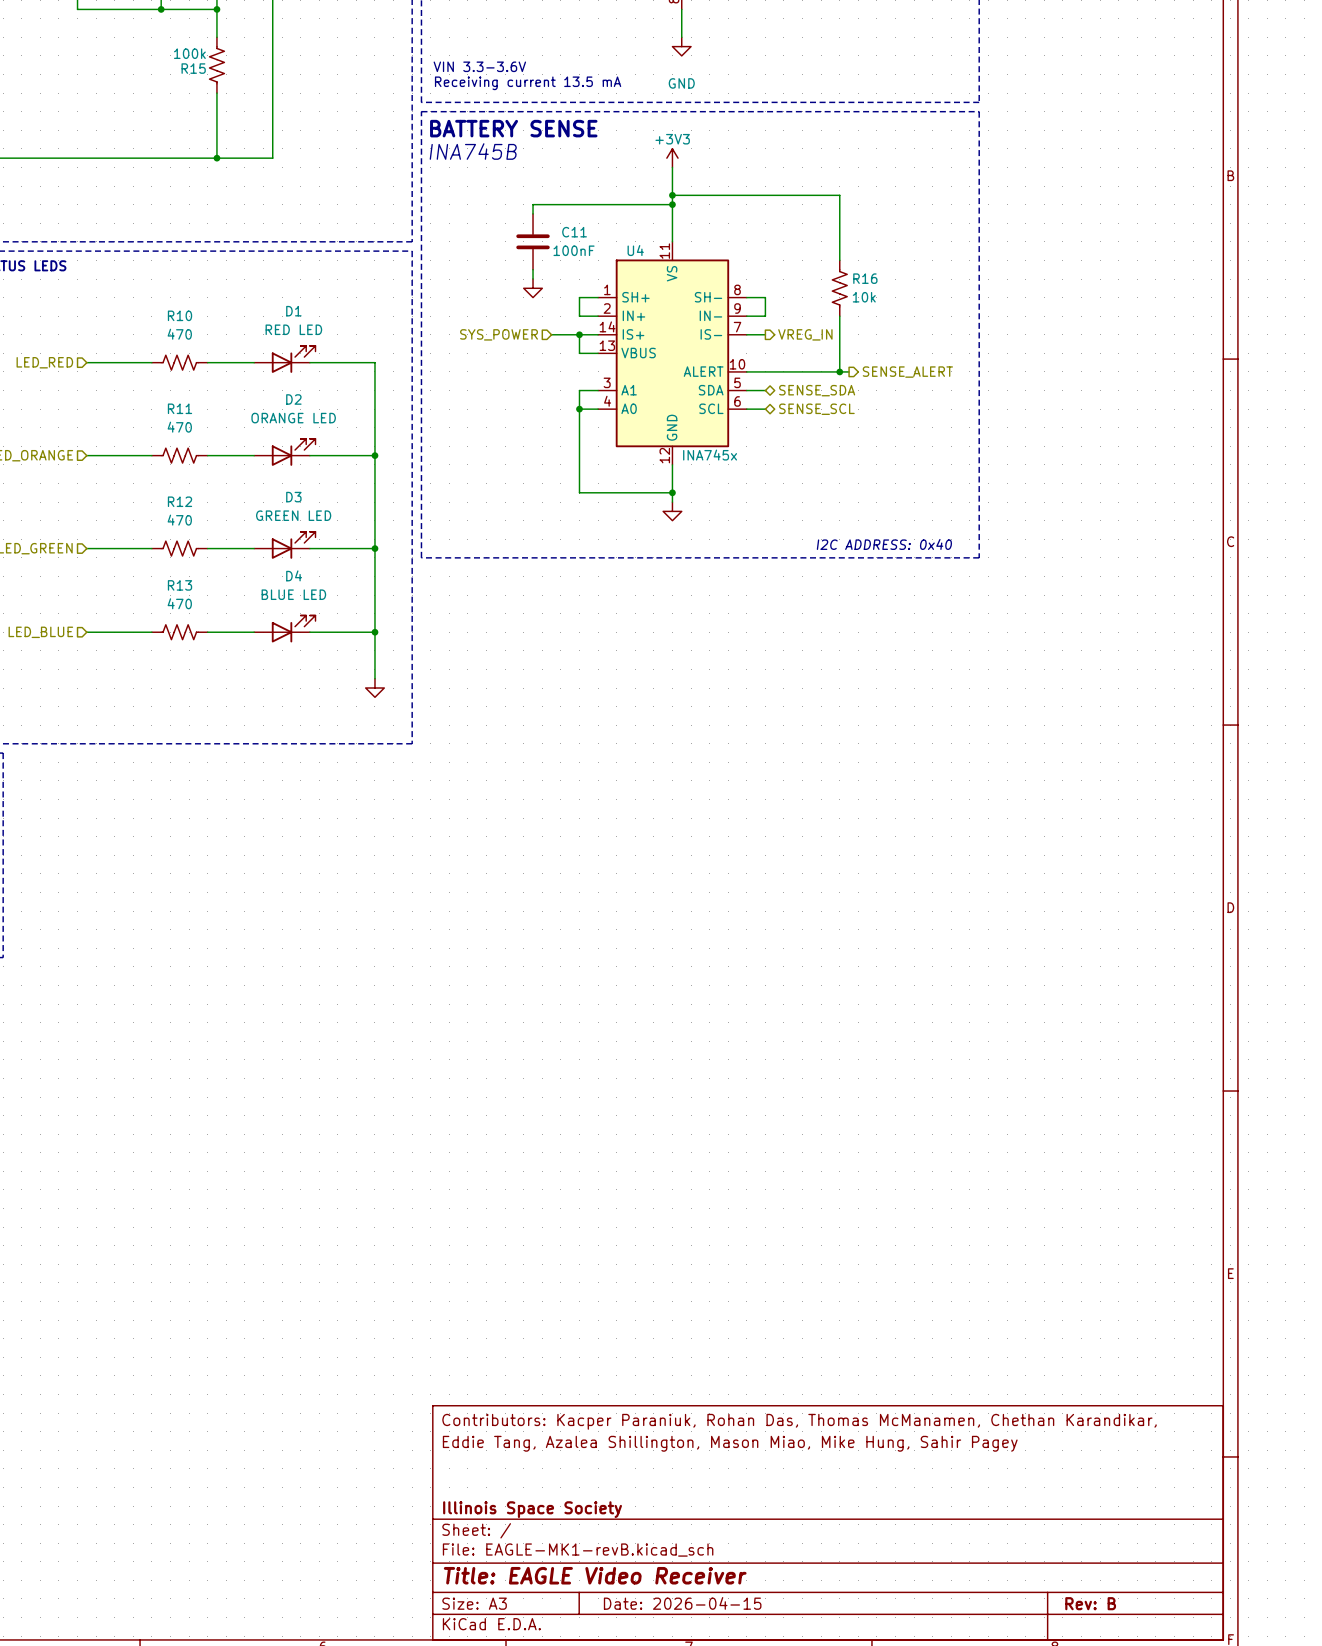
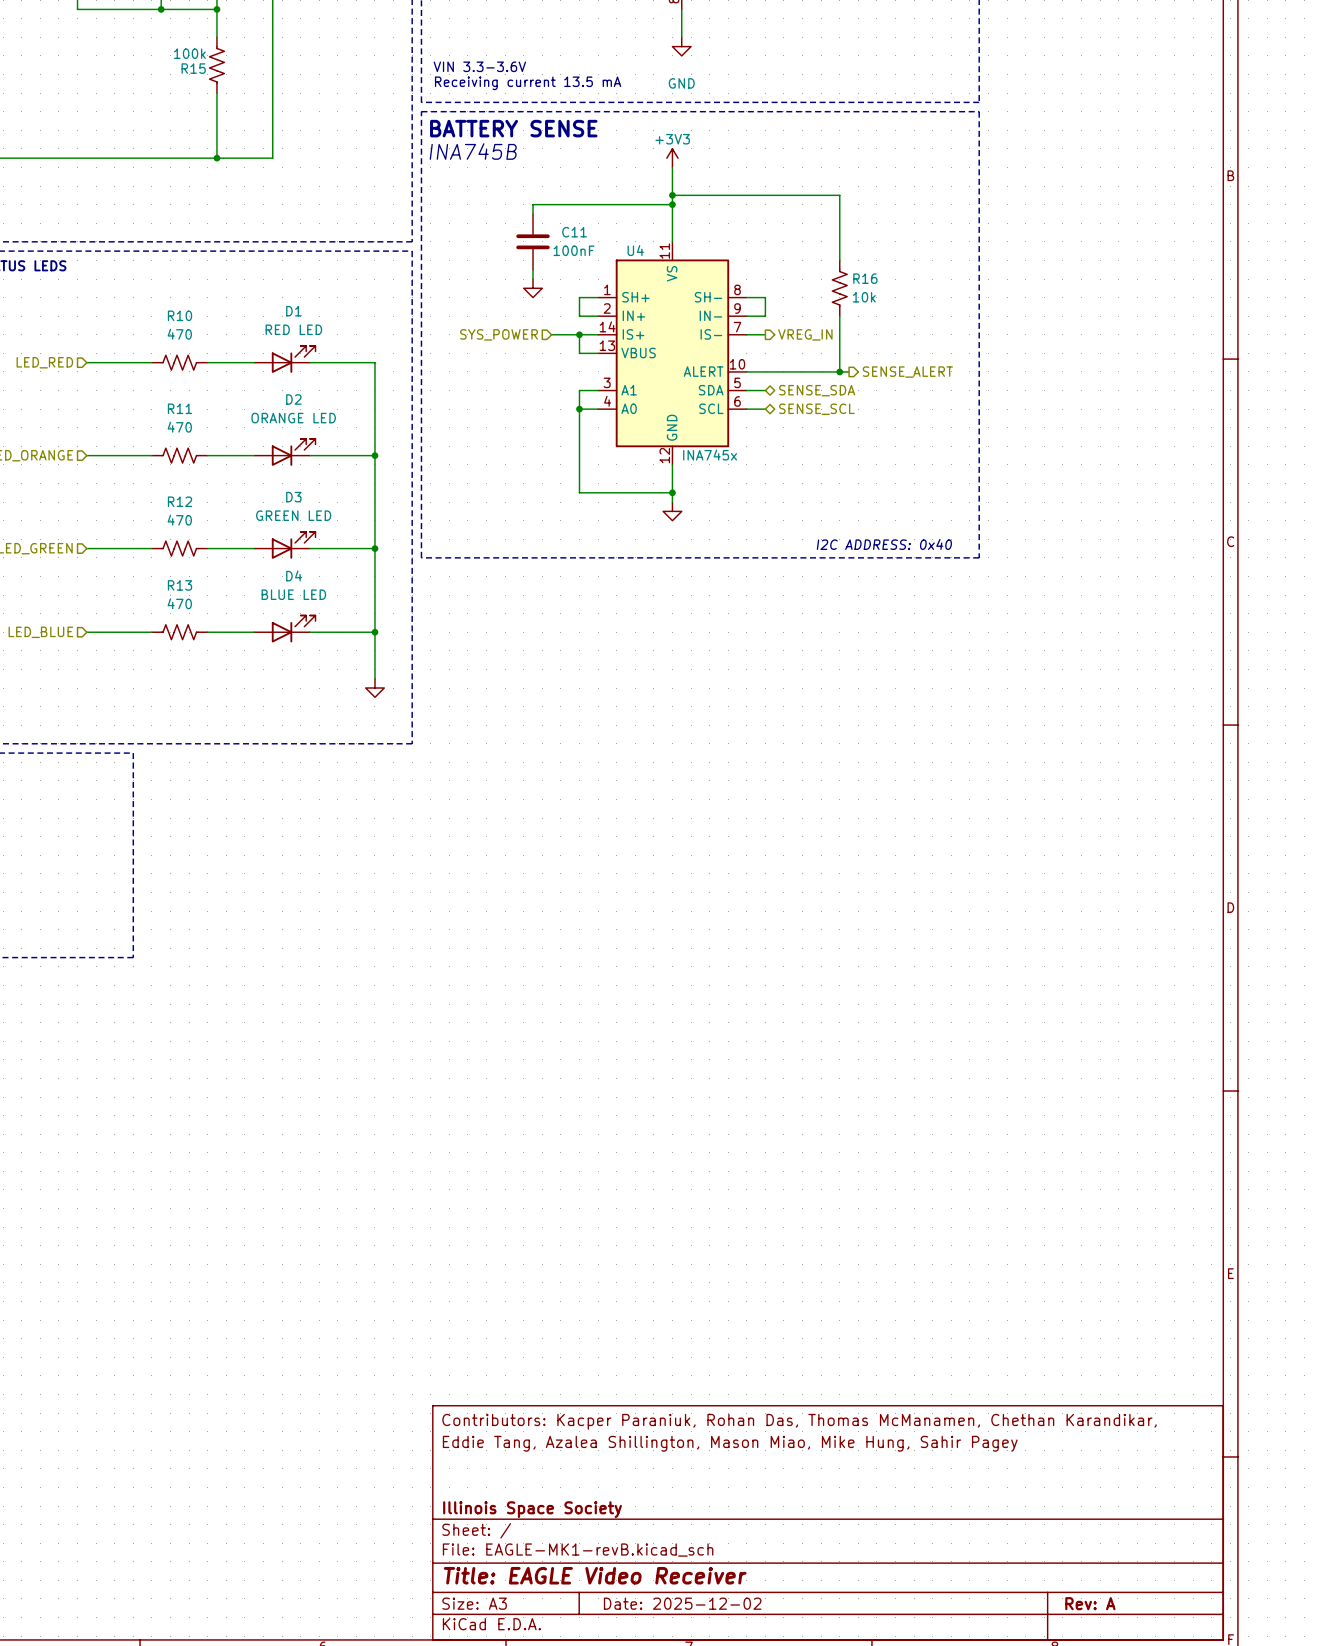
line: (3, 753) (3, 957) -> (3, 753) (133, 753) (133, 957) (3, 957)
title block: Date: 2026-04-15 (682, 1603) -> Date: 2025-12-02 (682, 1603)
title block: Rev: B (1090, 1603) -> Rev: A (1090, 1603)

